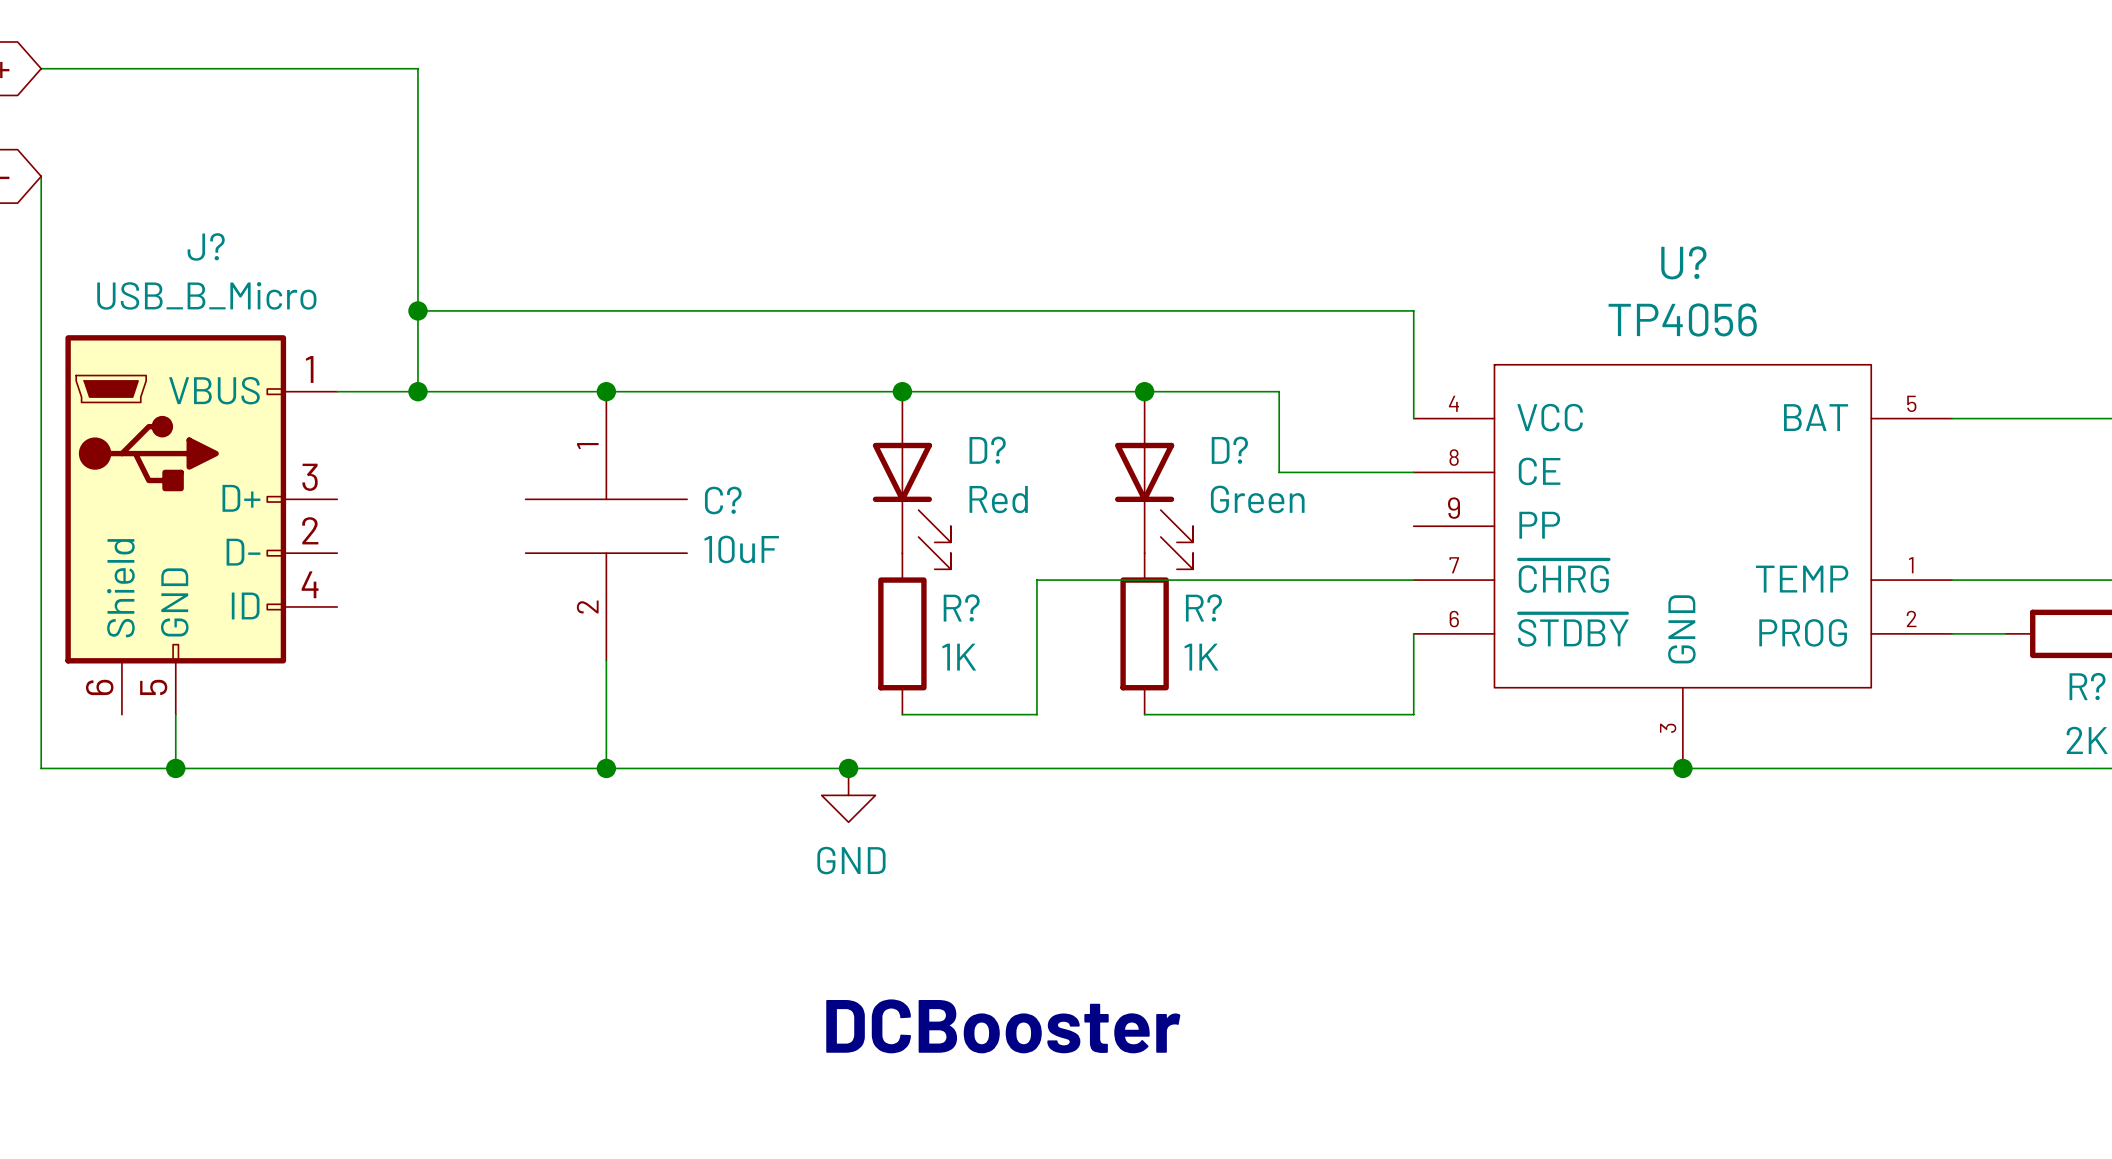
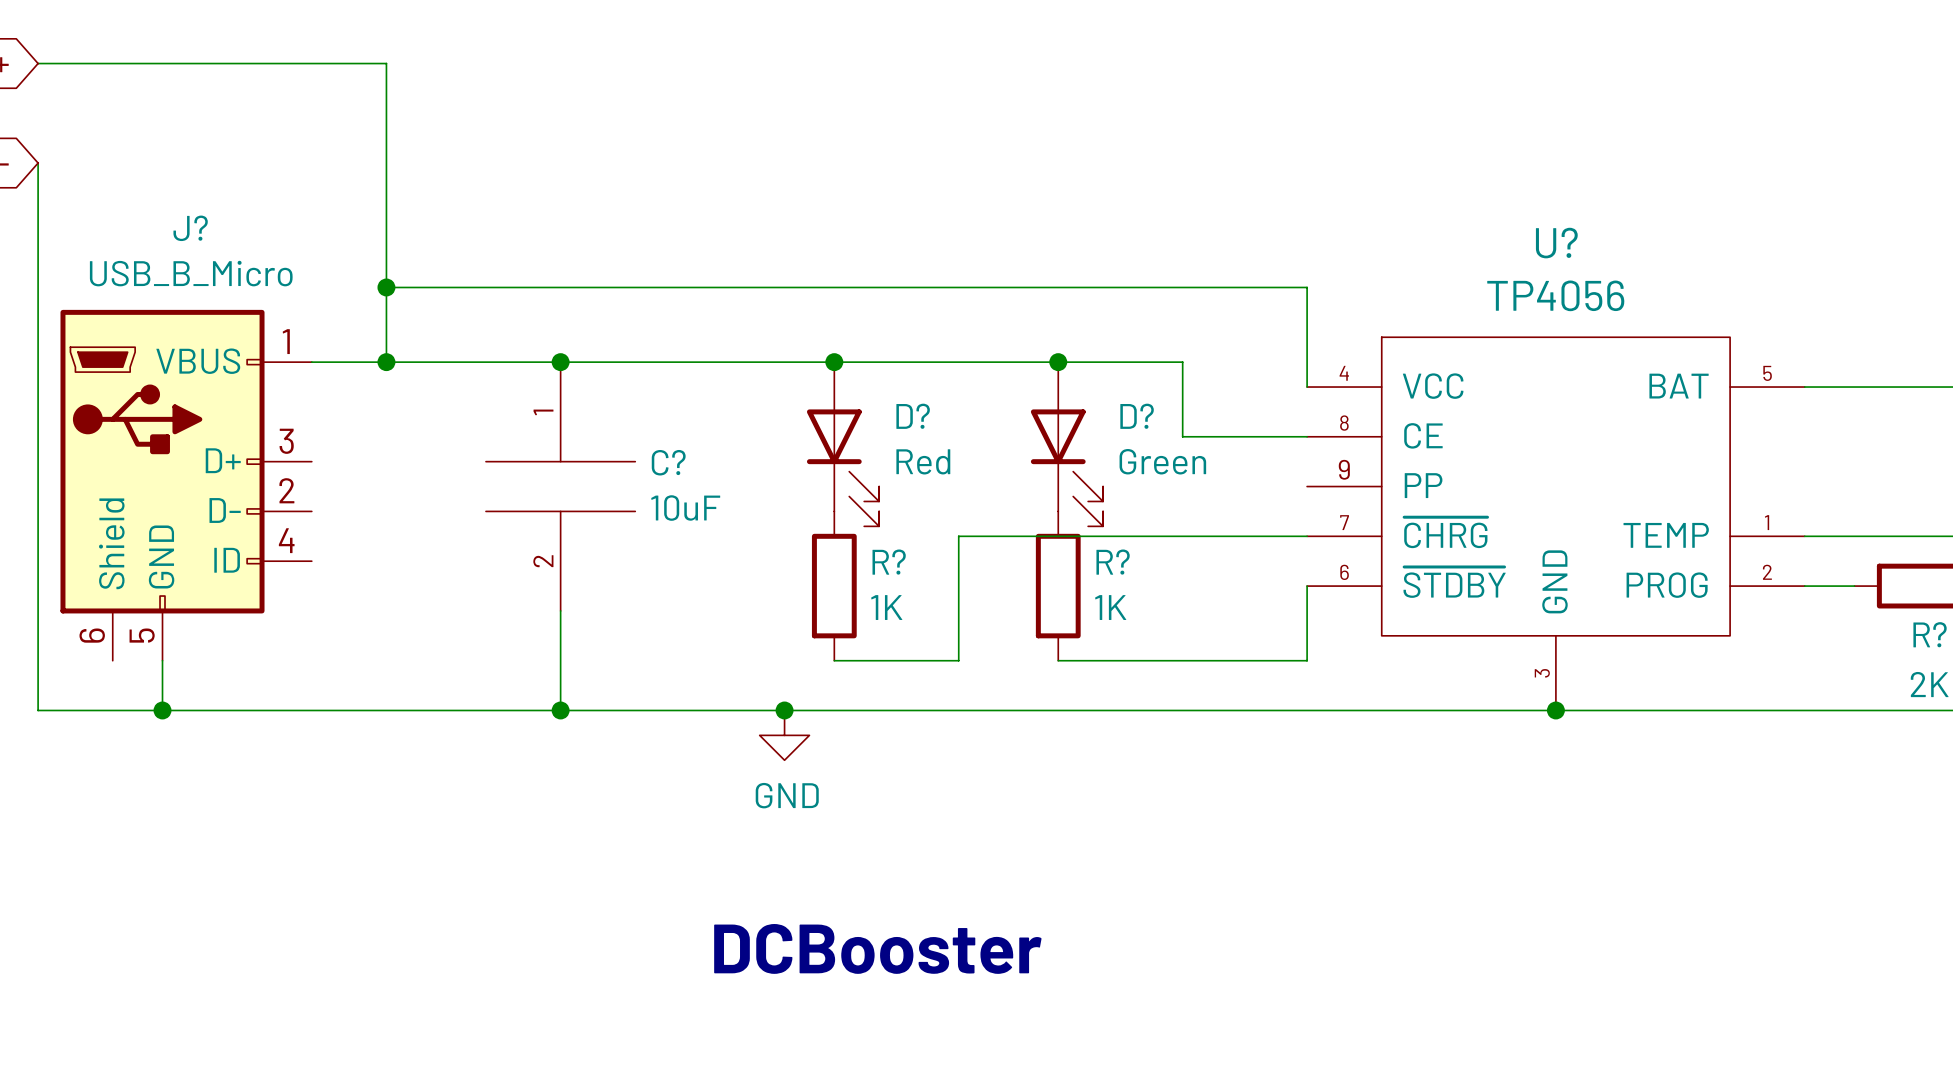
text position: DCBooster (1003, 1026) -> DCBooster (877, 948)

